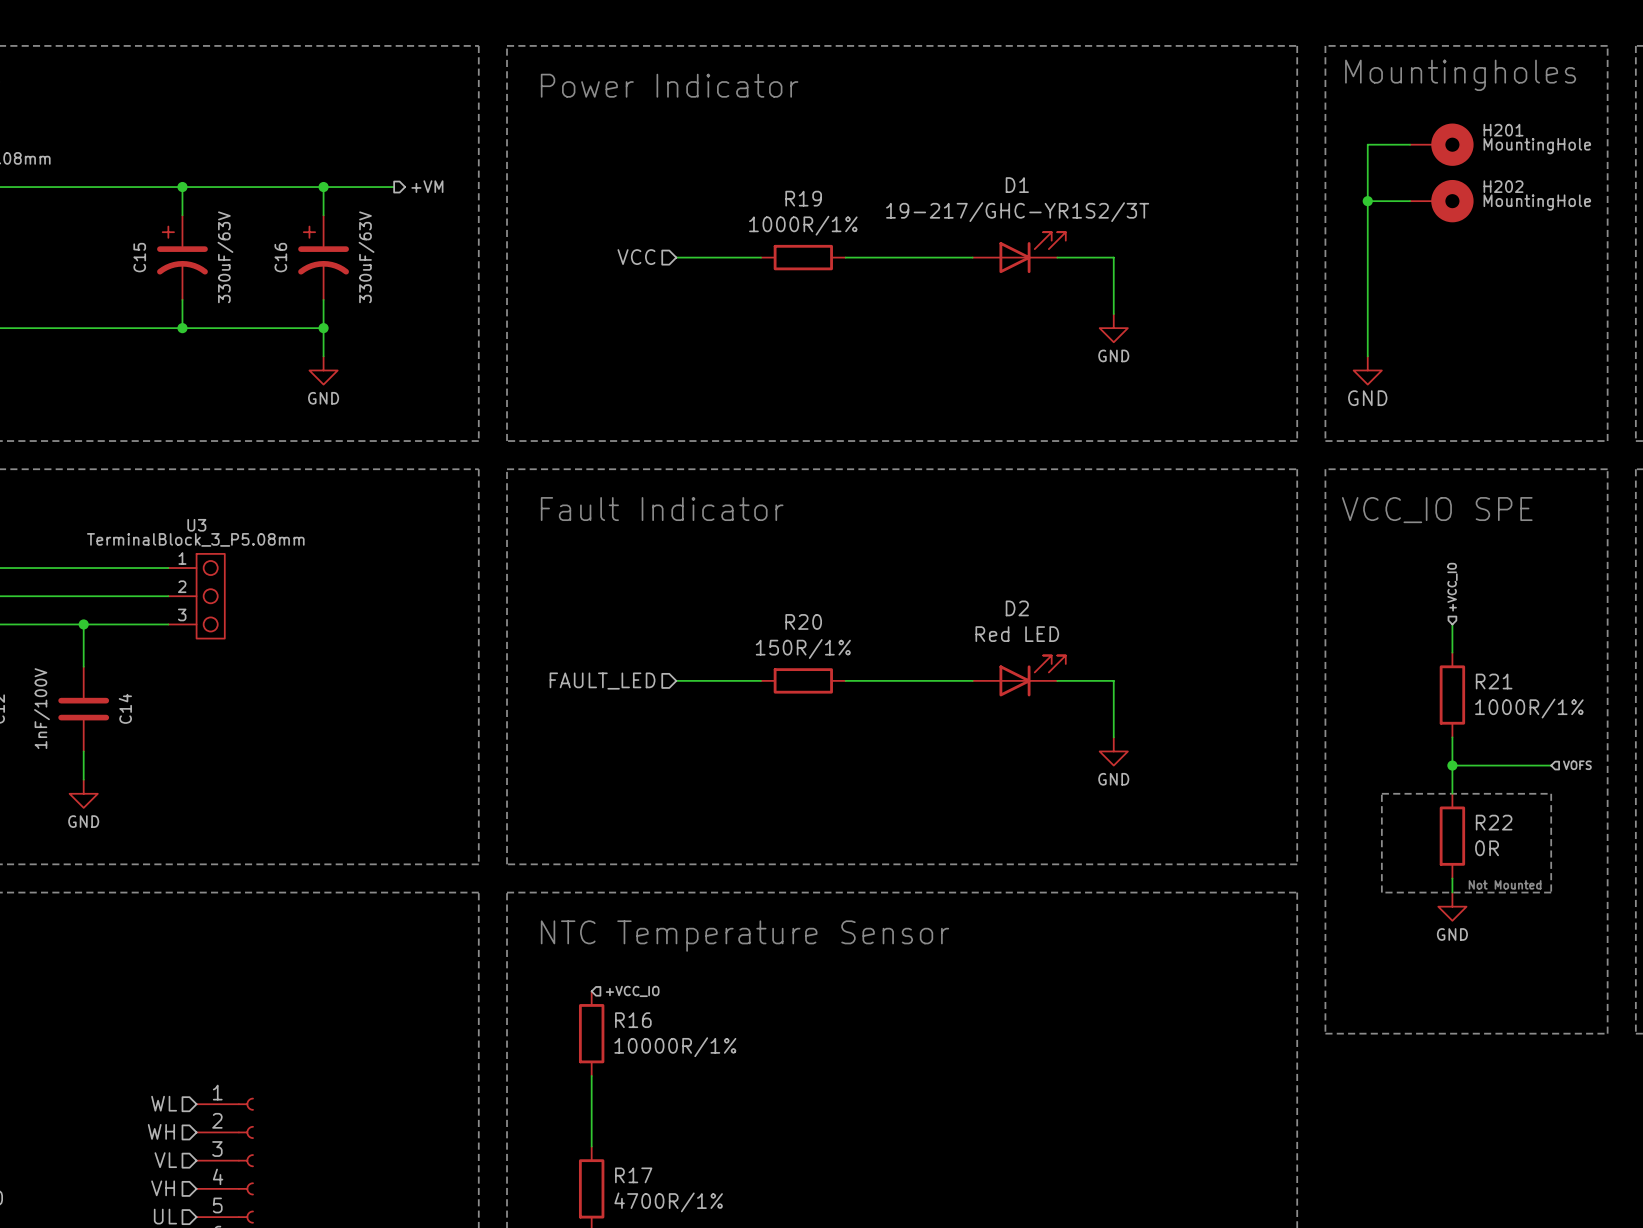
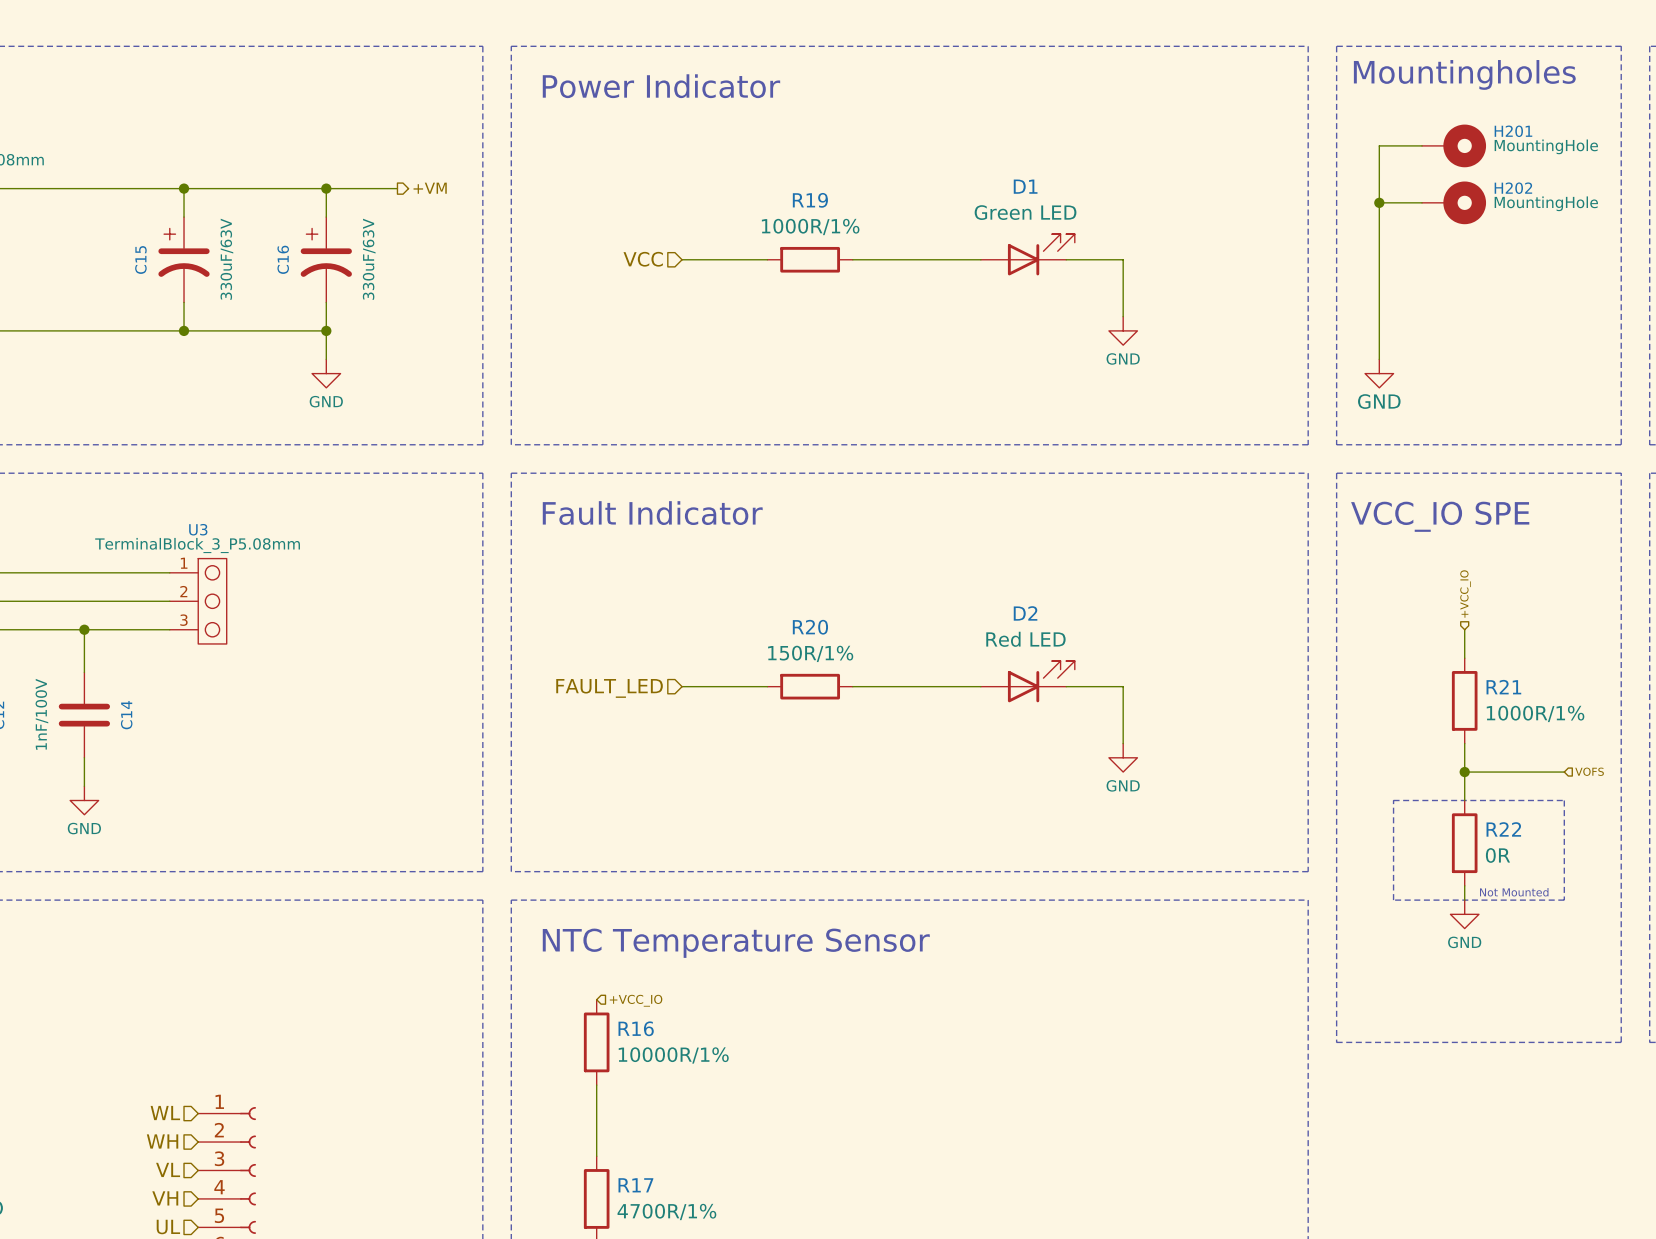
D1 value: 19-217/GHC-YR1S2/3T (1017, 212) -> Green LED (1025, 212)

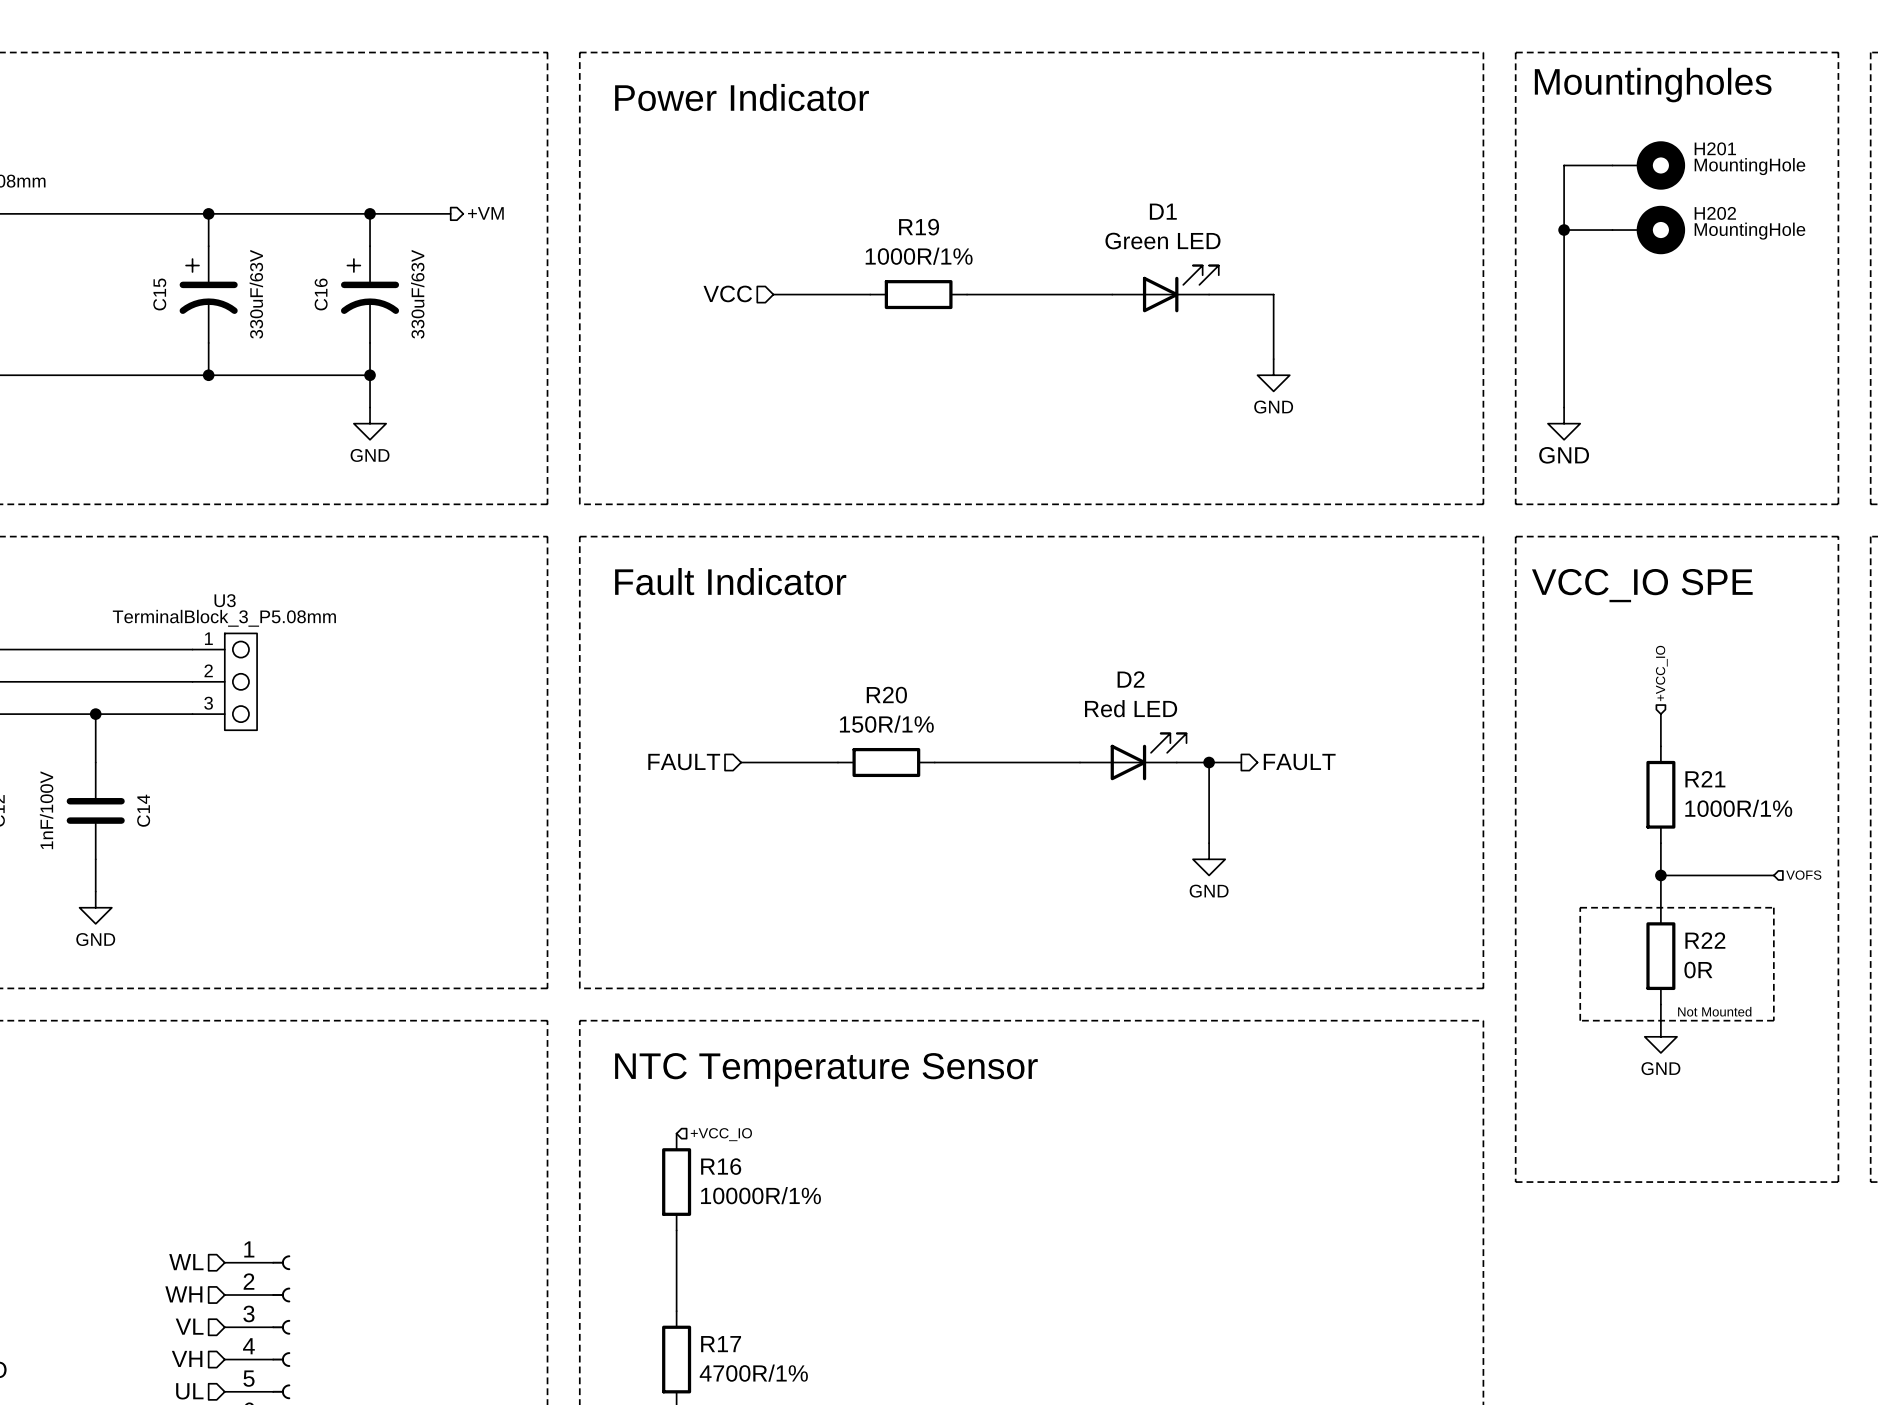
wire: none -> (1176, 762) (1241, 762)
wire: none -> (1209, 762) (1209, 843)
junction: none -> (1209, 762)
hierarchical label: none -> FAULT (1299, 762)
D2 position: (1027, 681) -> (1133, 756)
wire: (682, 686) (767, 686) -> (741, 762) (837, 762)
R20 position: (810, 686) -> (886, 762)
wire: (852, 686) (980, 686) -> (934, 762) (1080, 762)
wire: (1066, 686) (1123, 686) (1123, 743) -> none
hierarchical label: FAULT_LED (609, 688) -> FAULT (684, 762)
power symbol position: GND (1123, 757) -> GND (1209, 859)

